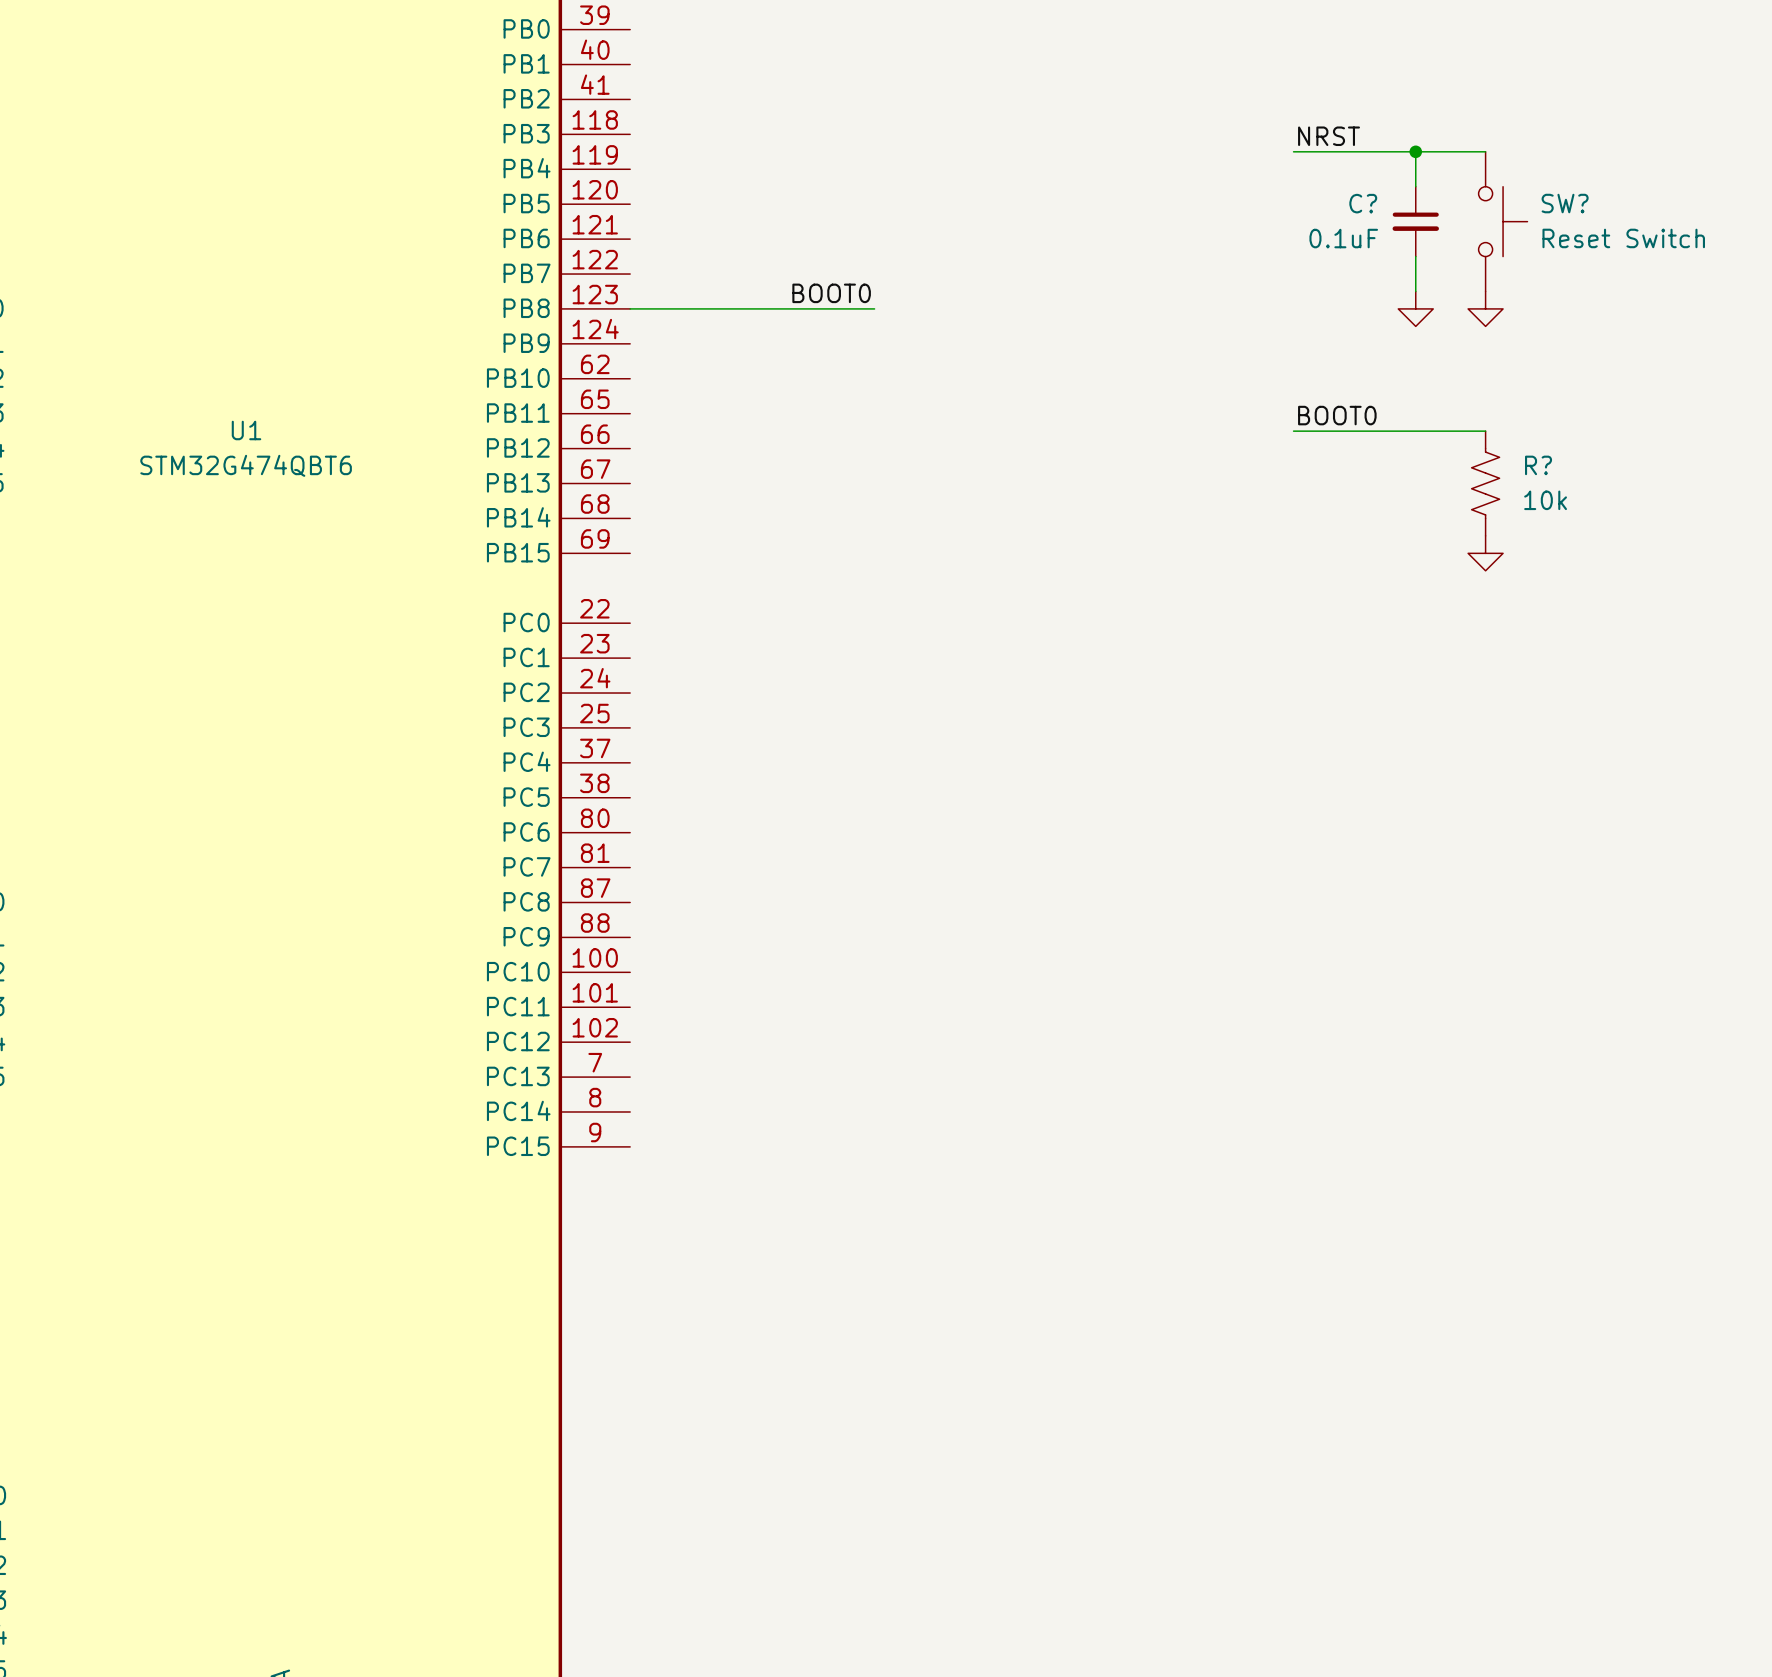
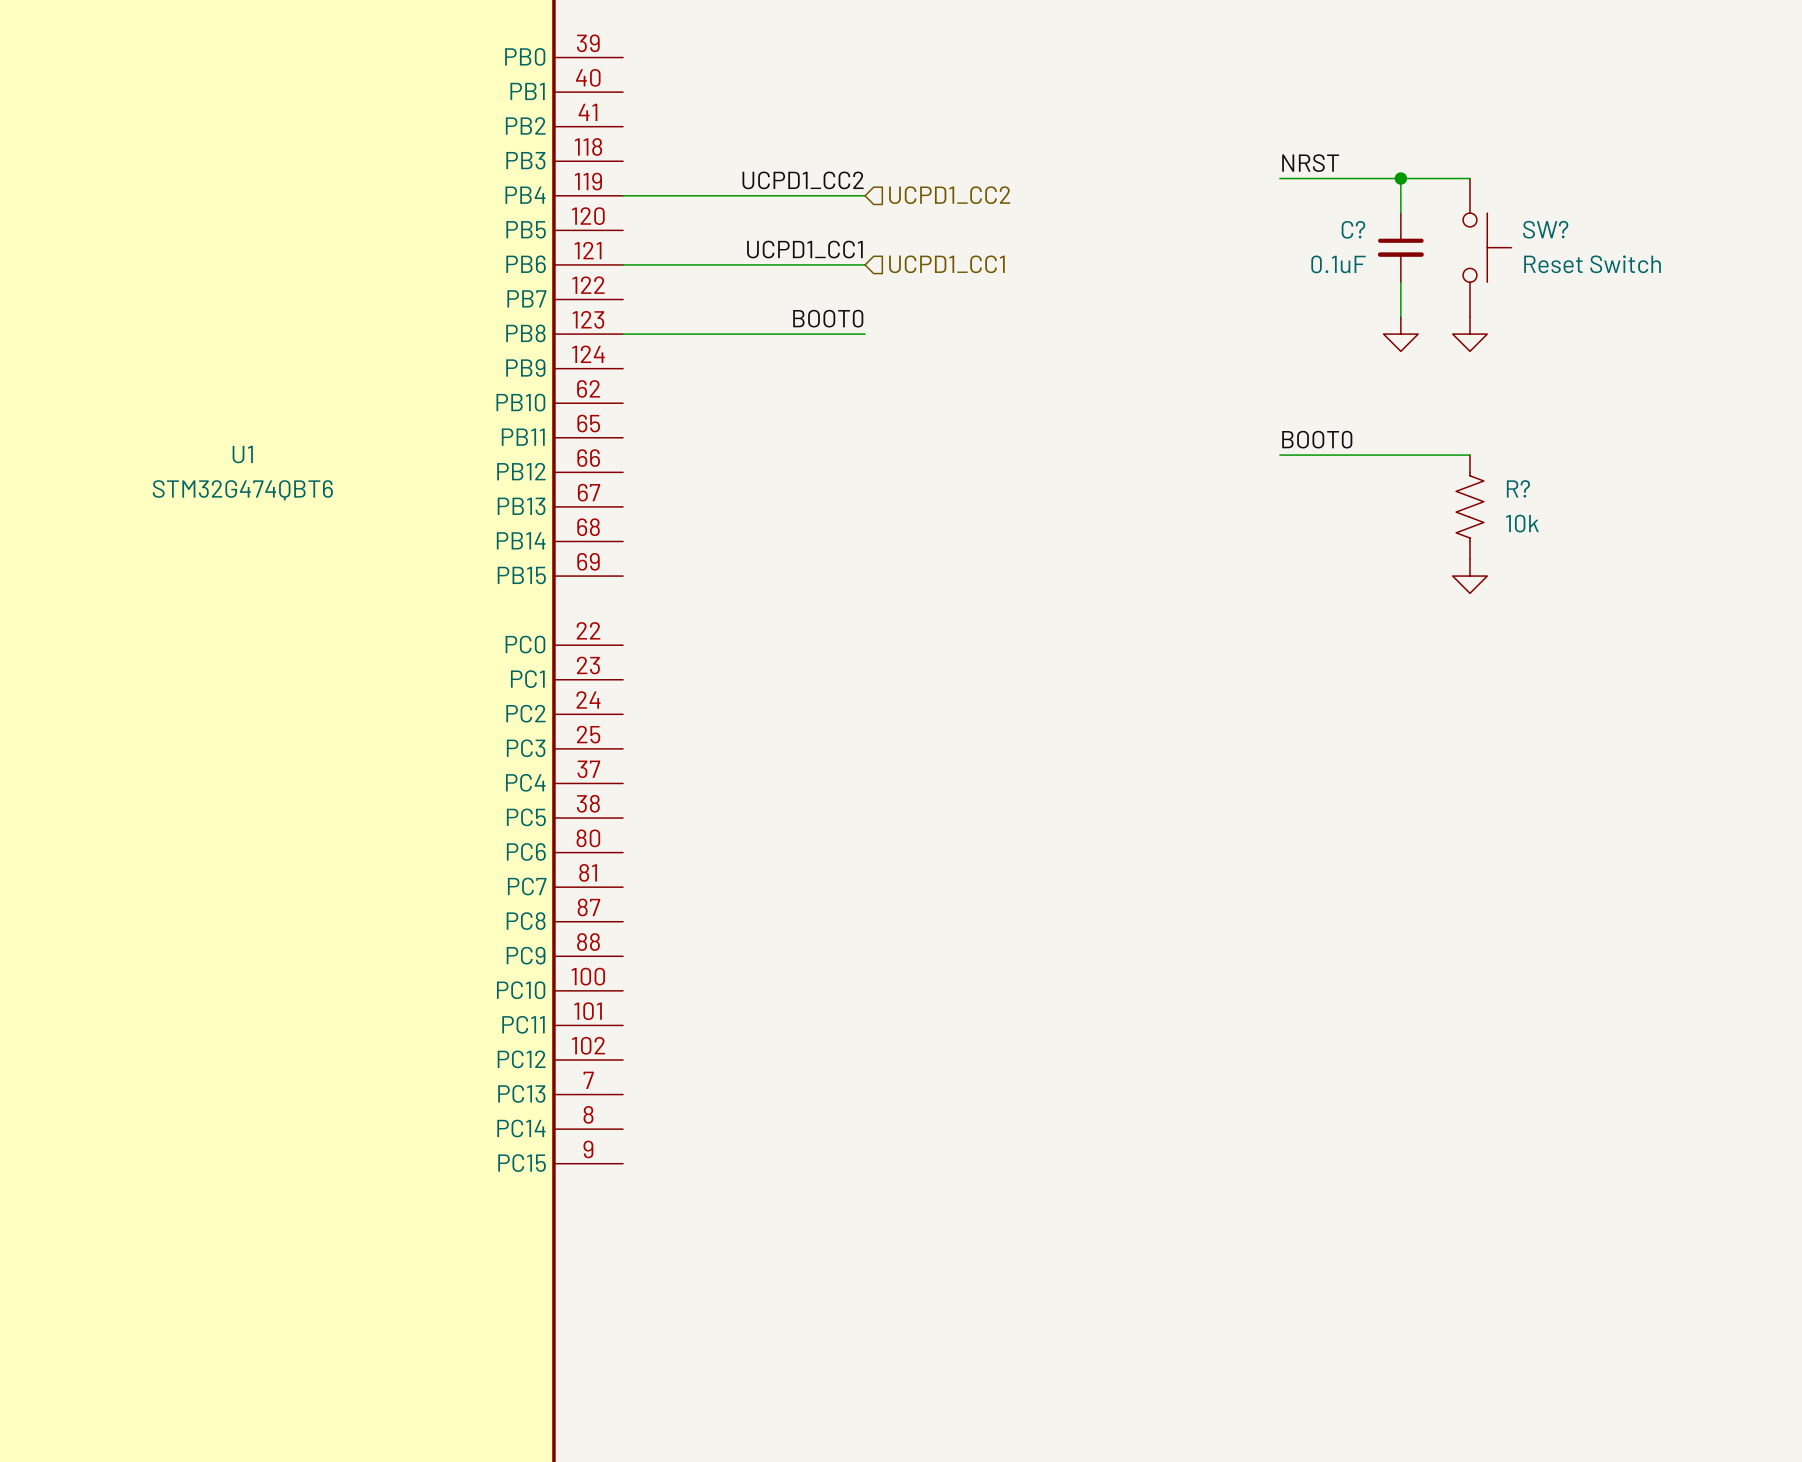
label: none -> UCPD1_CC2 (803, 180)
wire: none -> (623, 195) (865, 195)
hierarchical label: none -> UCPD1_CC2 (949, 195)
label: none -> UCPD1_CC1 (804, 249)
wire: none -> (623, 264) (865, 264)
hierarchical label: none -> UCPD1_CC1 (946, 264)

